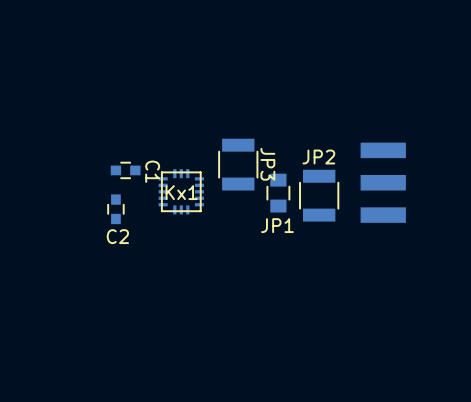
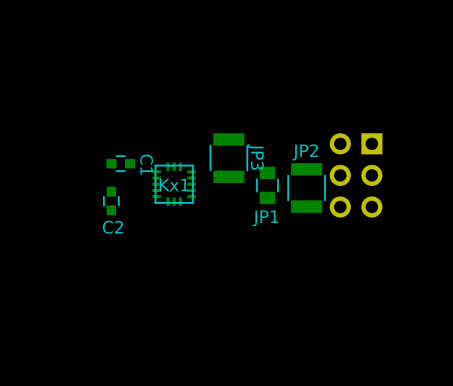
part: (383, 150) -> none
part footprint: [360, 174, 406, 191] -> [329, 133, 383, 218]
part: (383, 215) -> none

